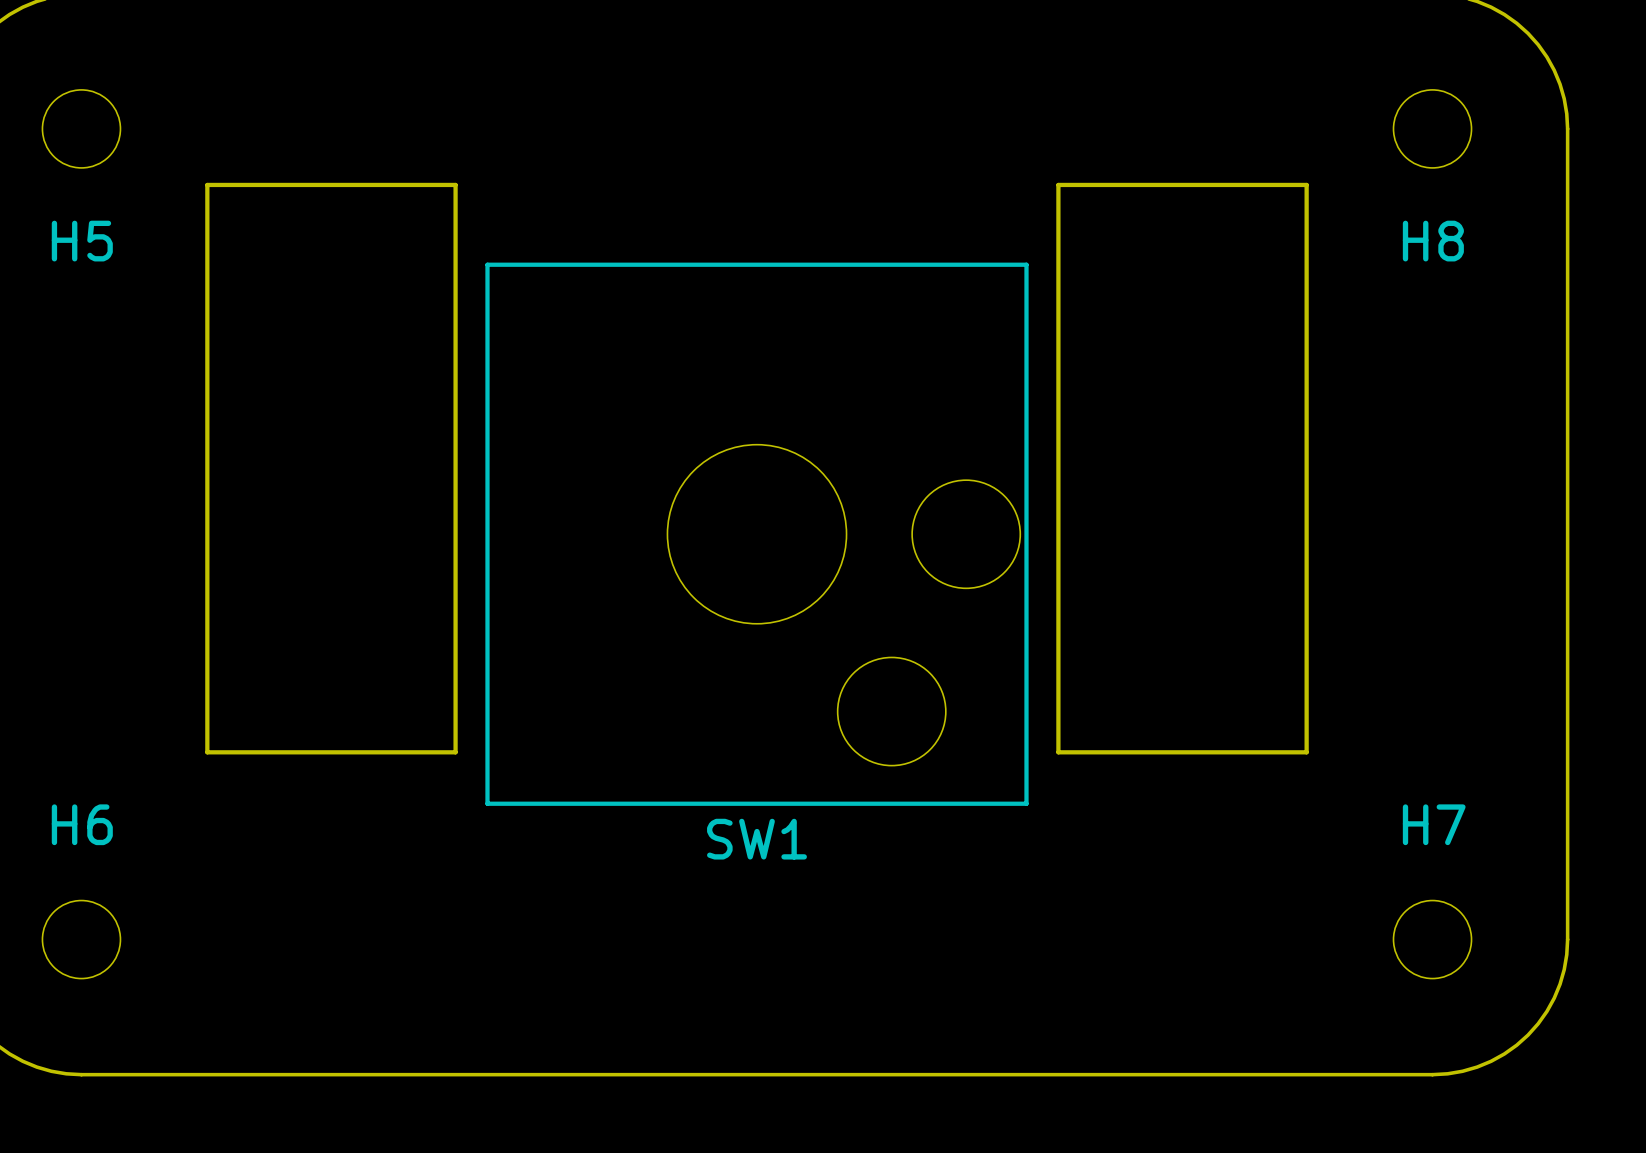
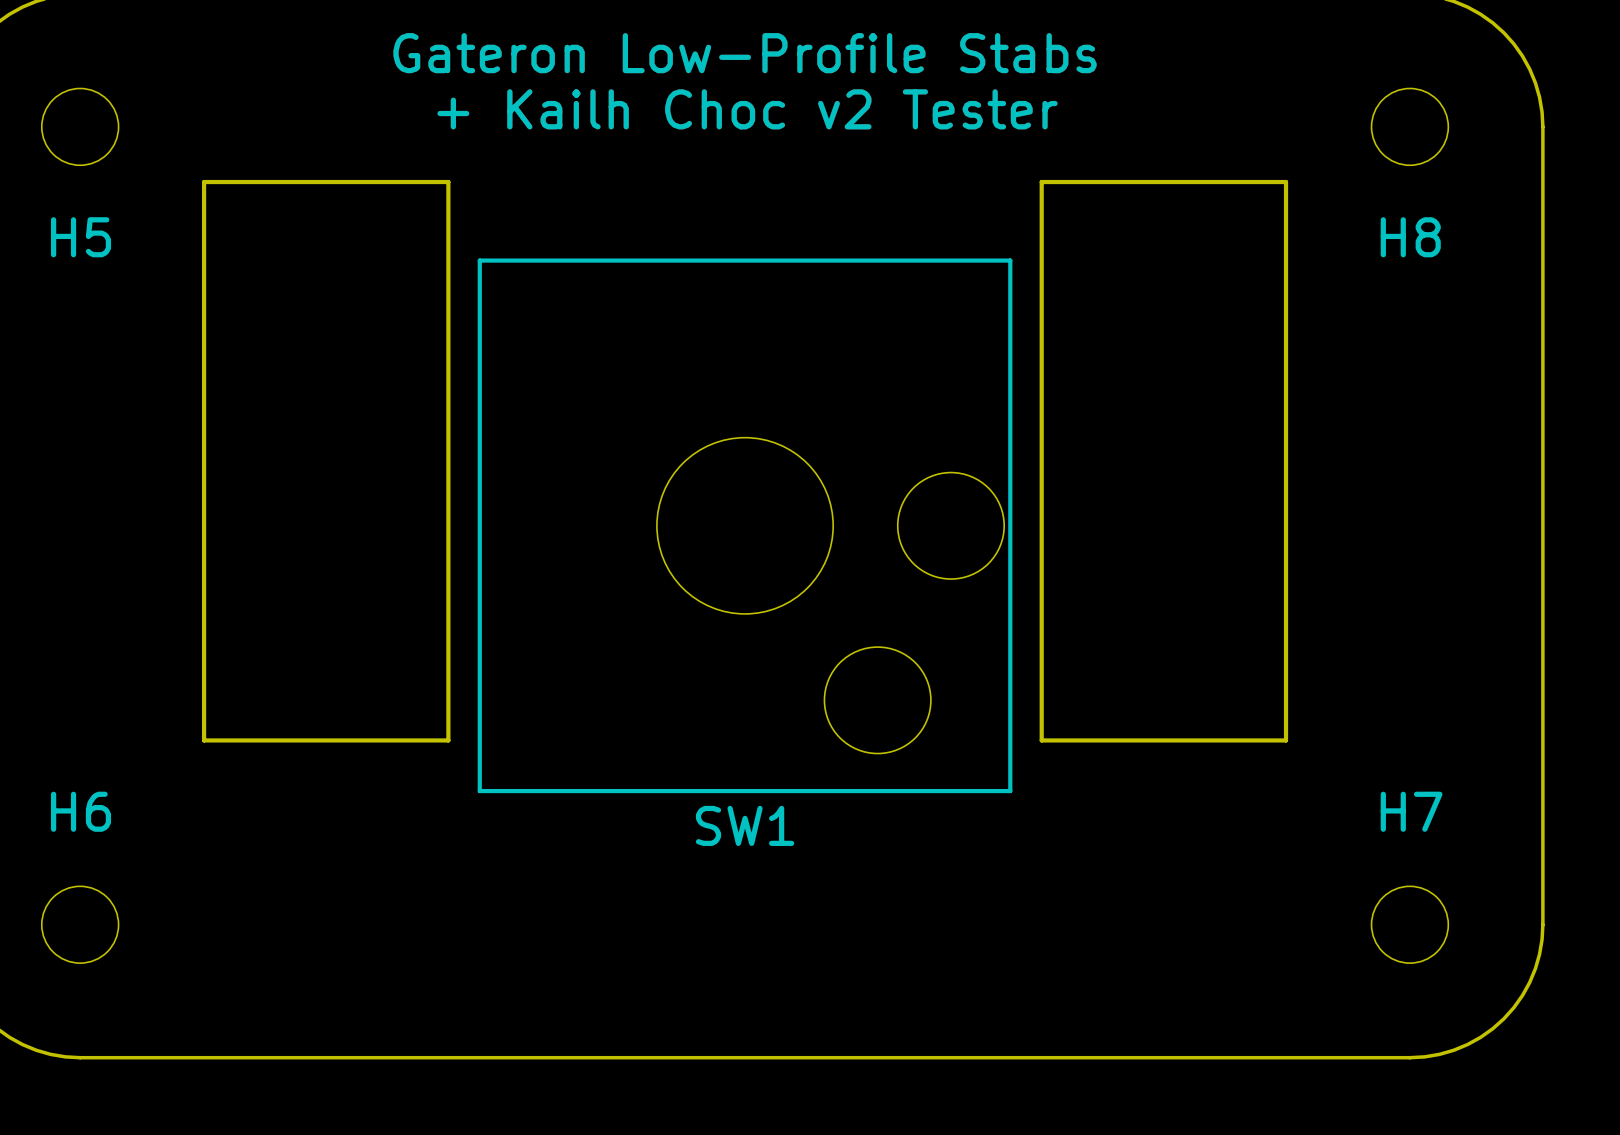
text: none -> Gateron Low-Profile Stabs (745, 53)
text: none -> + Kailh Choc v2 Tester (747, 109)

